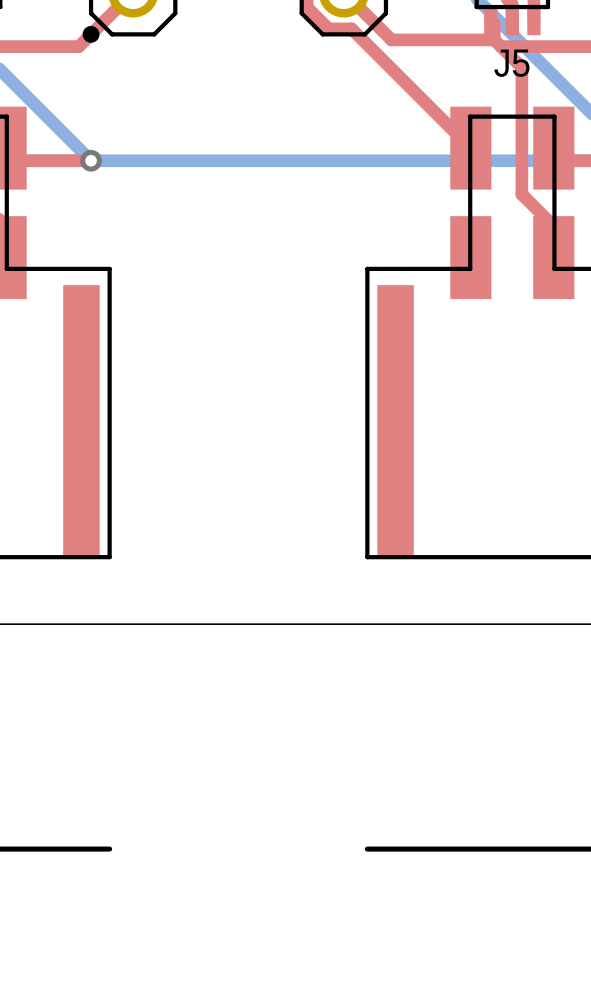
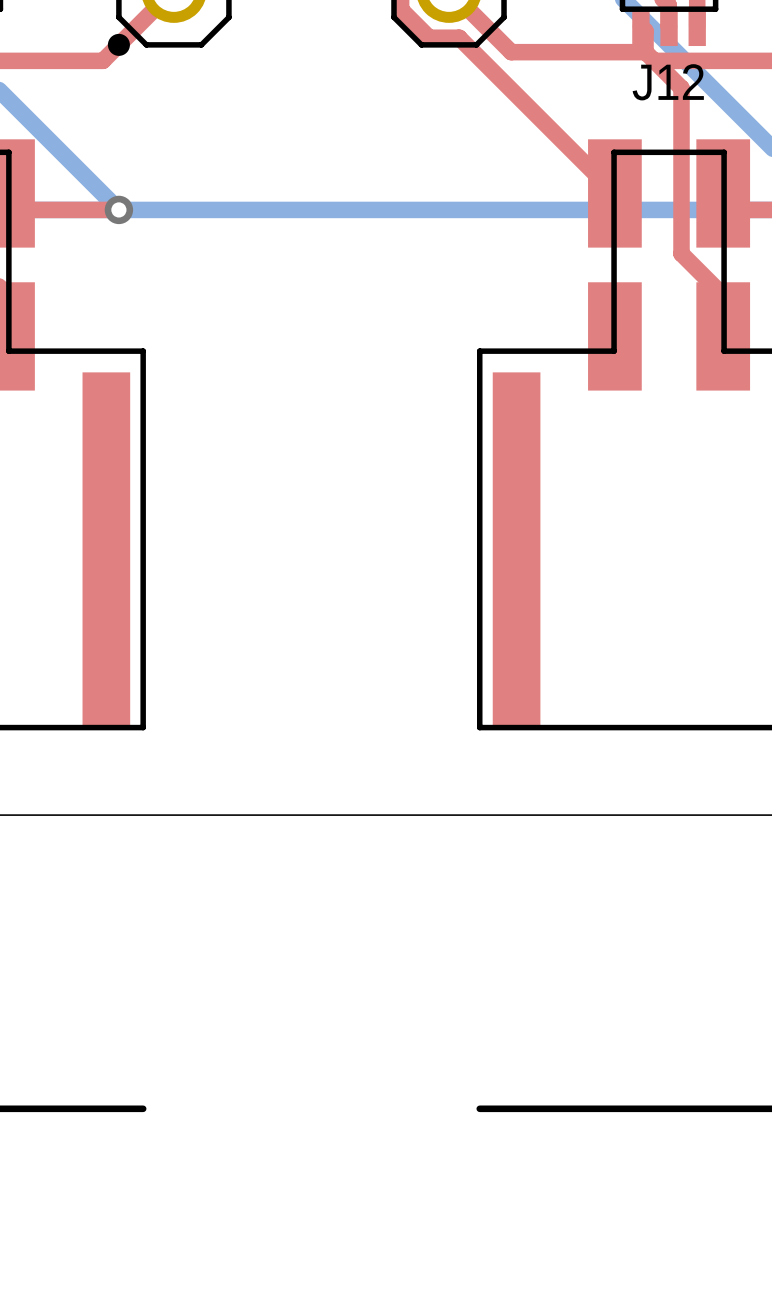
J5 name: J5 (511, 63) -> J12 (668, 82)

